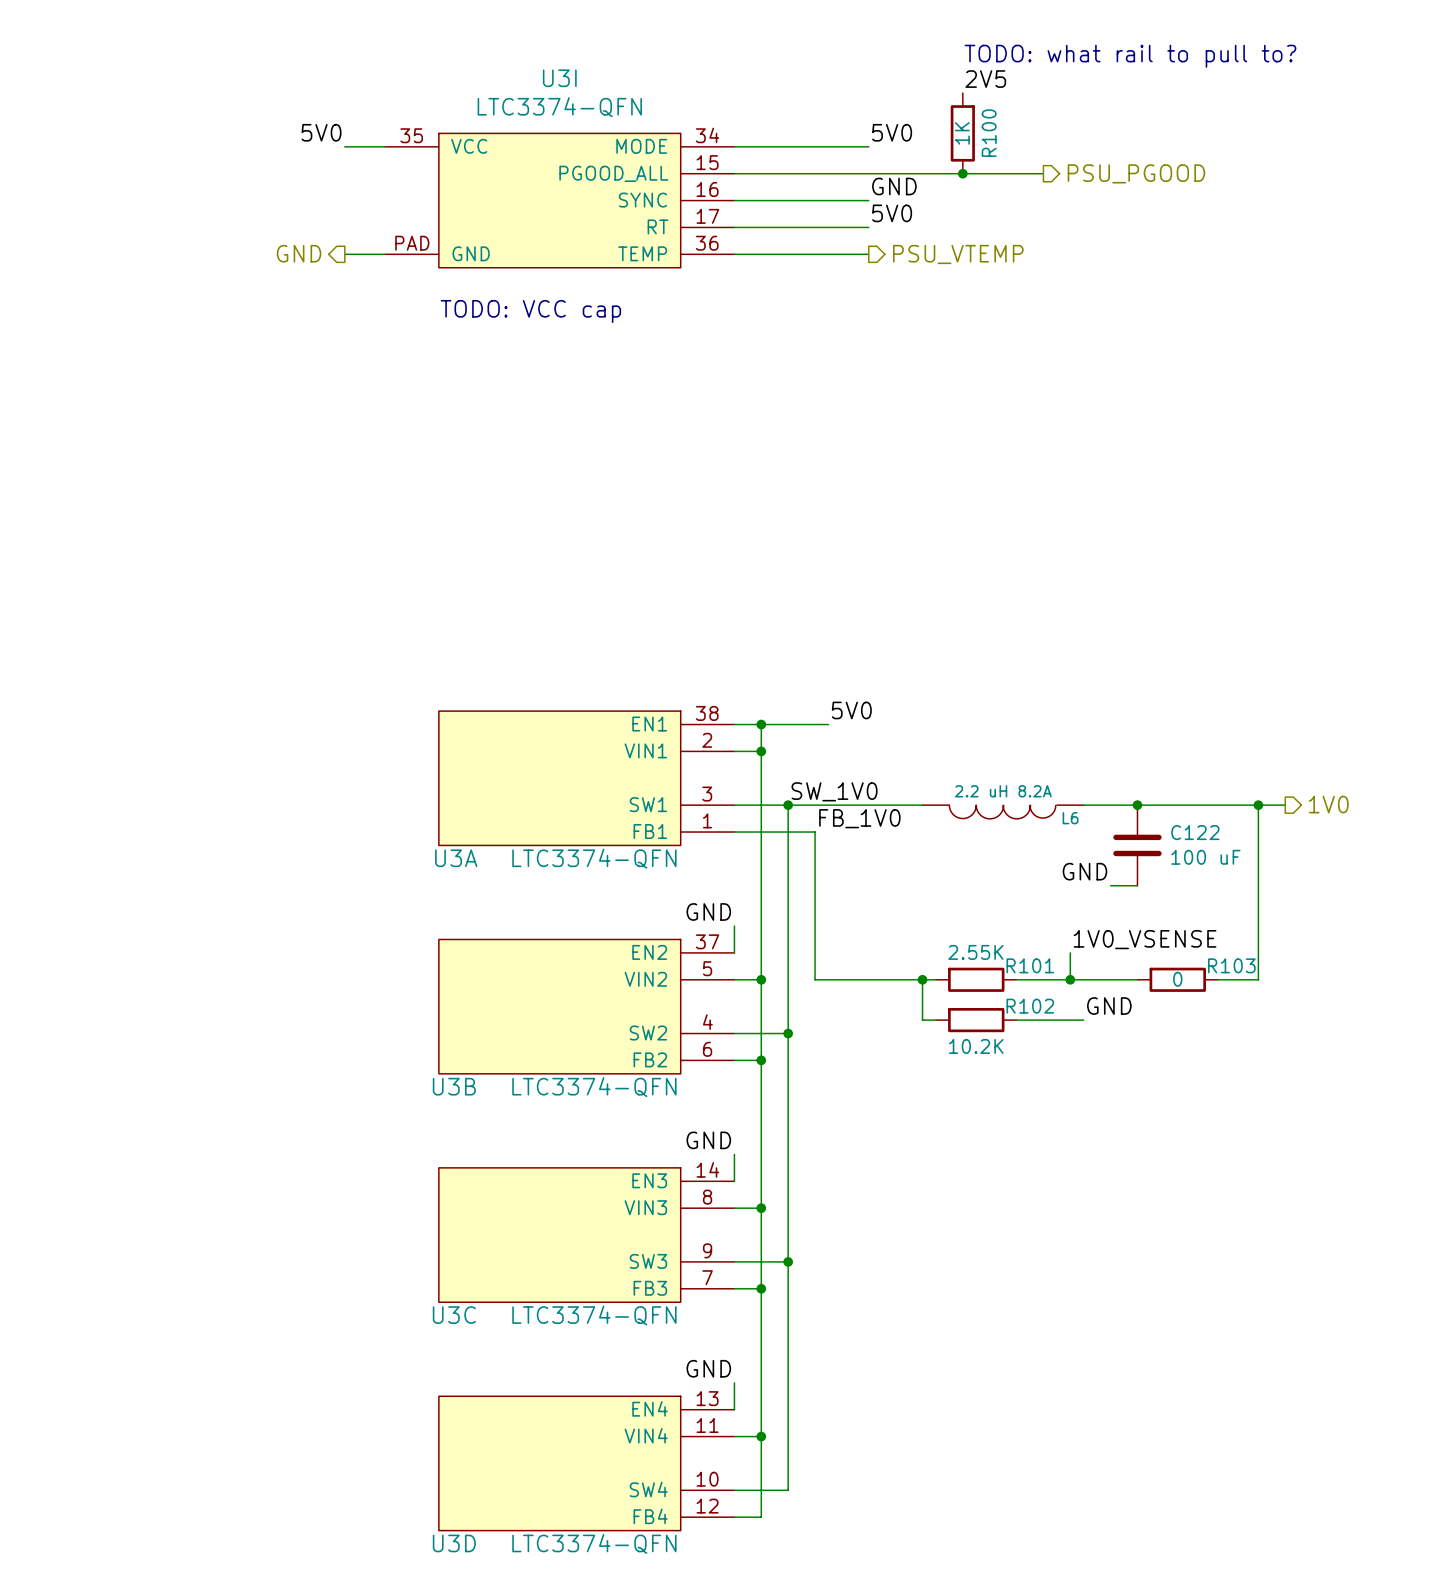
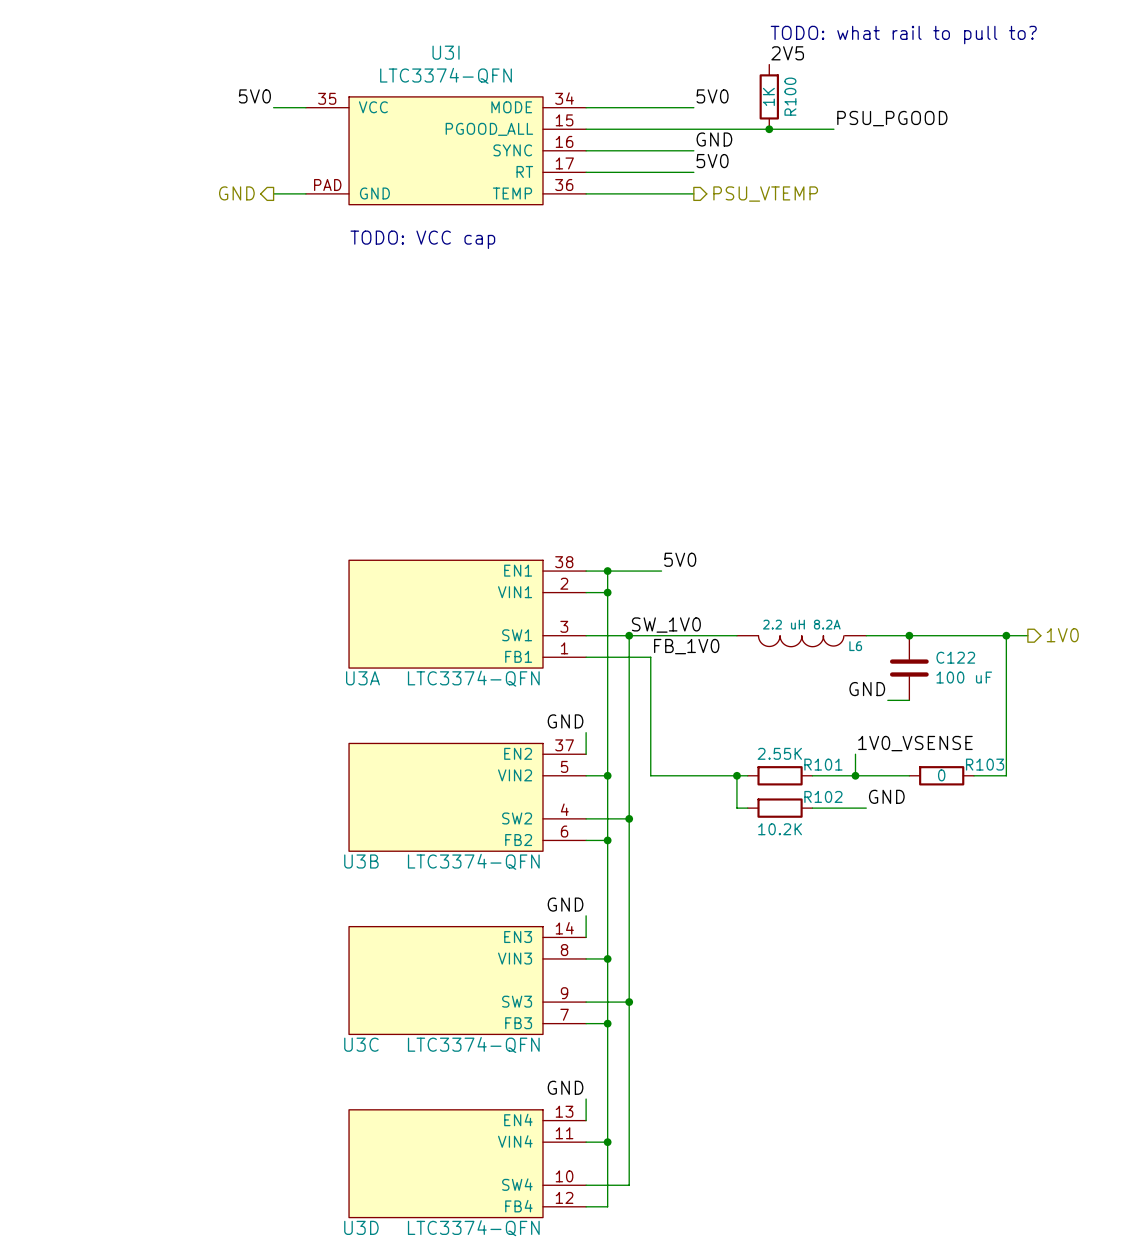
label: none -> PSU_PGOOD (892, 118)
hierarchical label: PSU_PGOOD (1136, 173) -> none

